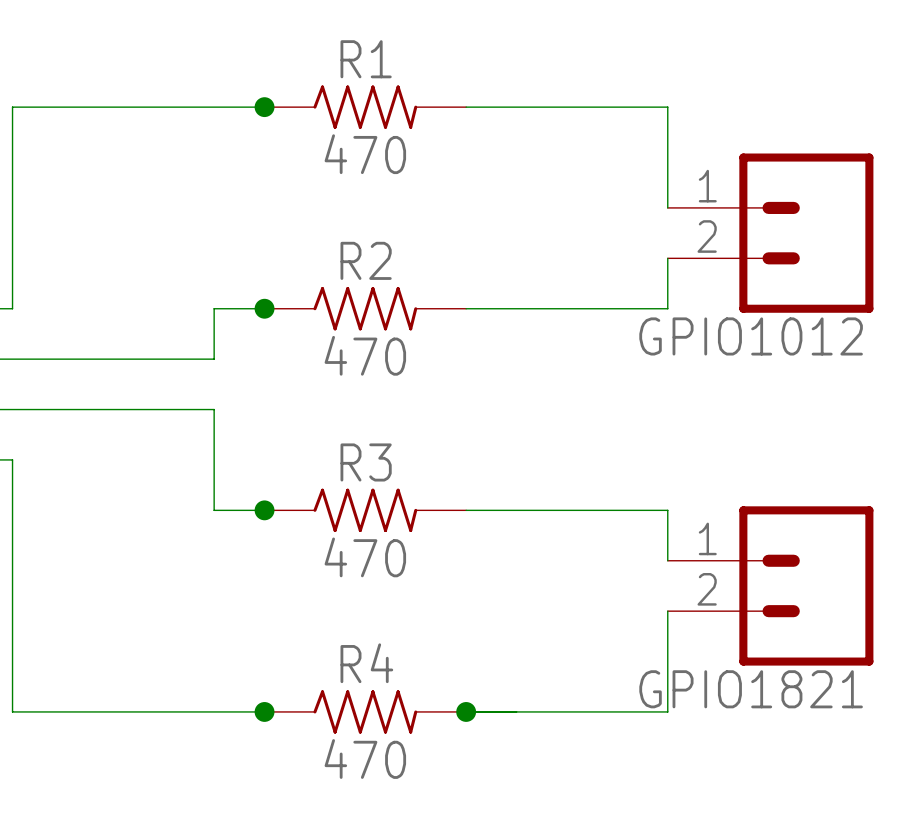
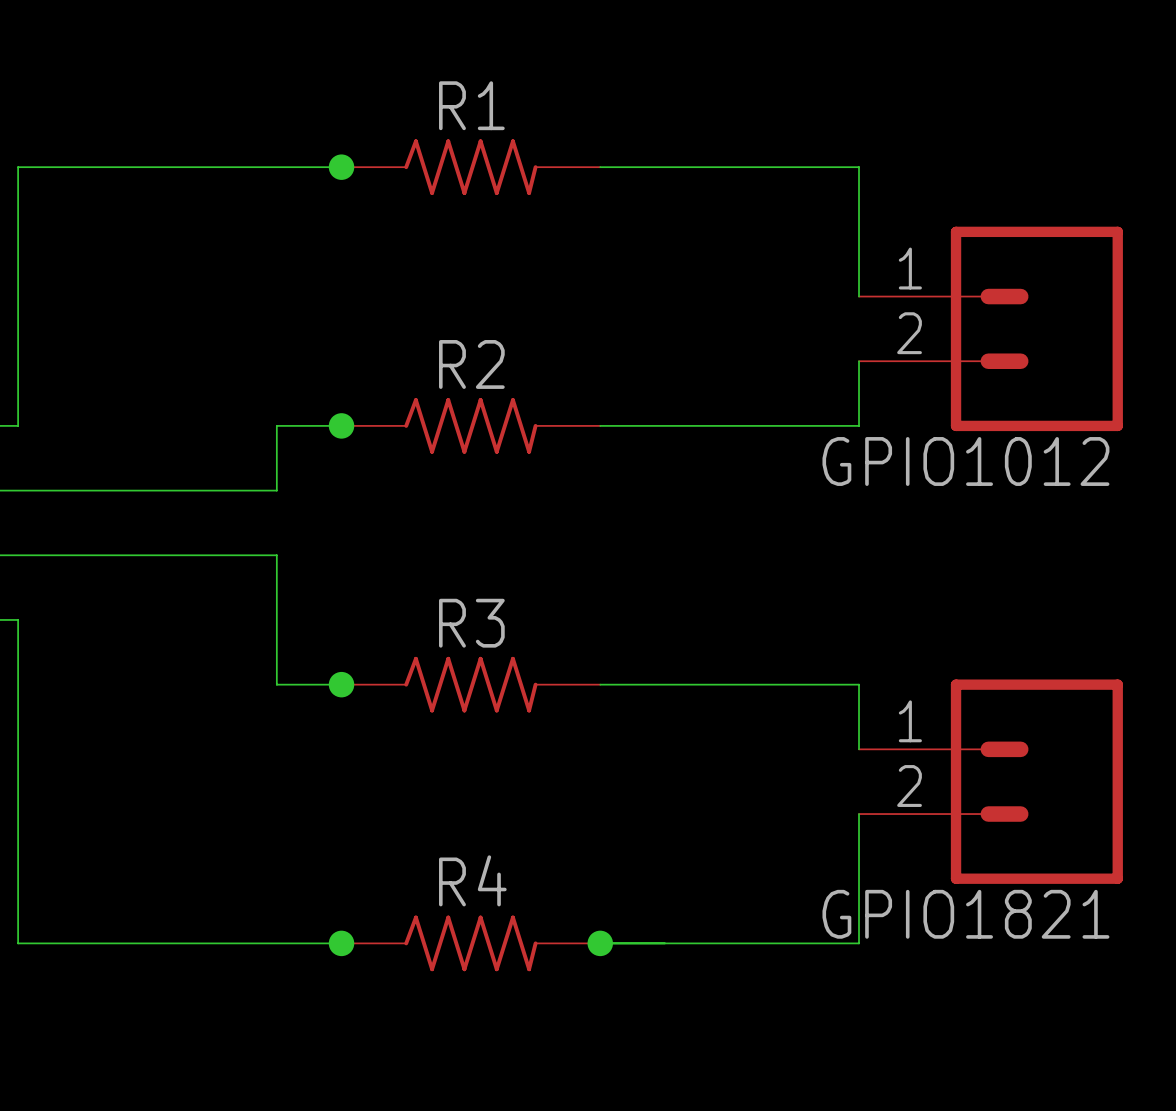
R1 value: 470 (365, 154) -> none
R2 value: 470 (365, 355) -> none
R3 value: 470 (365, 557) -> none
R4 value: 470 (365, 759) -> none

